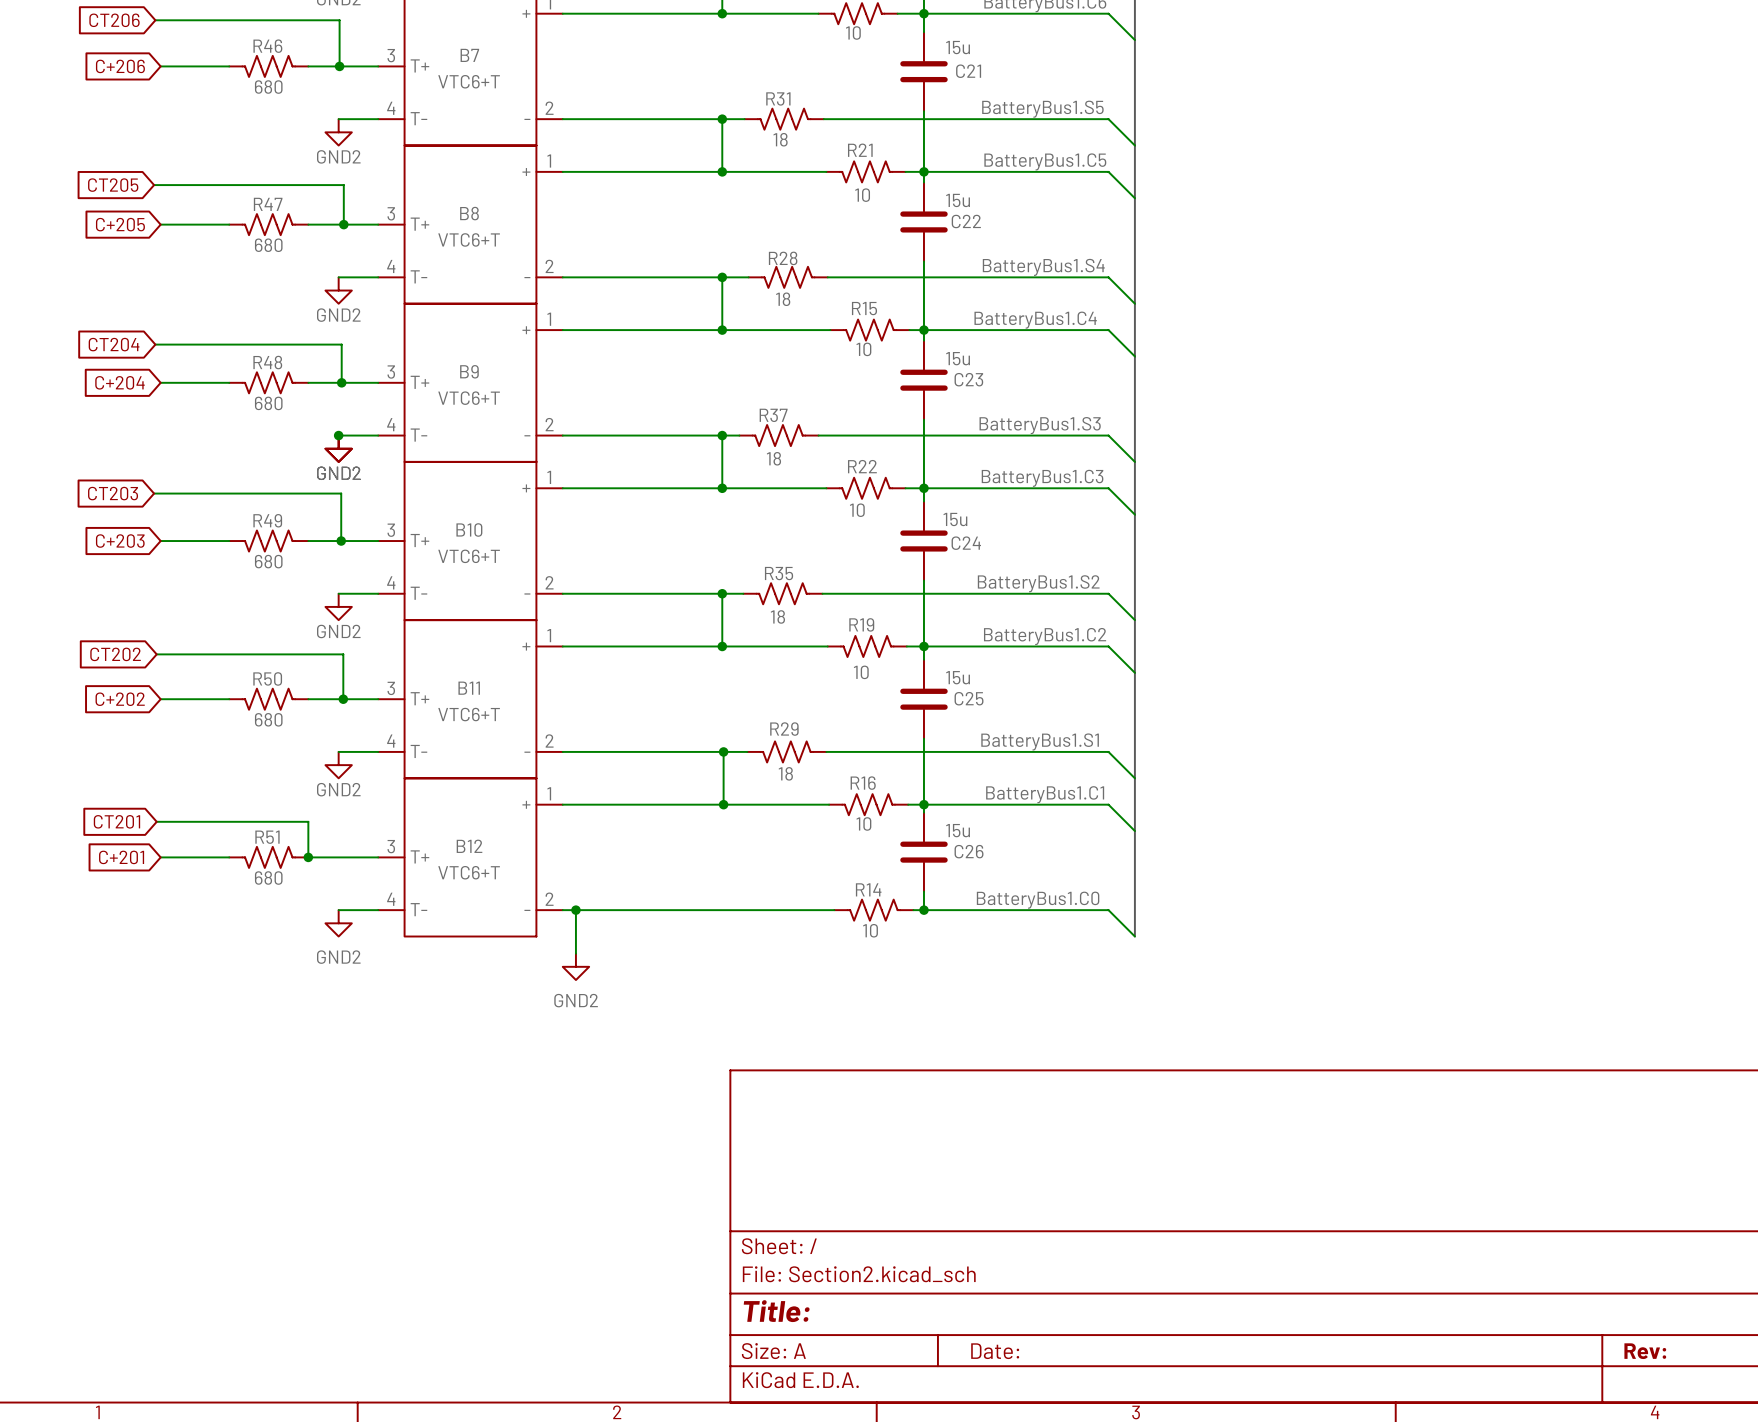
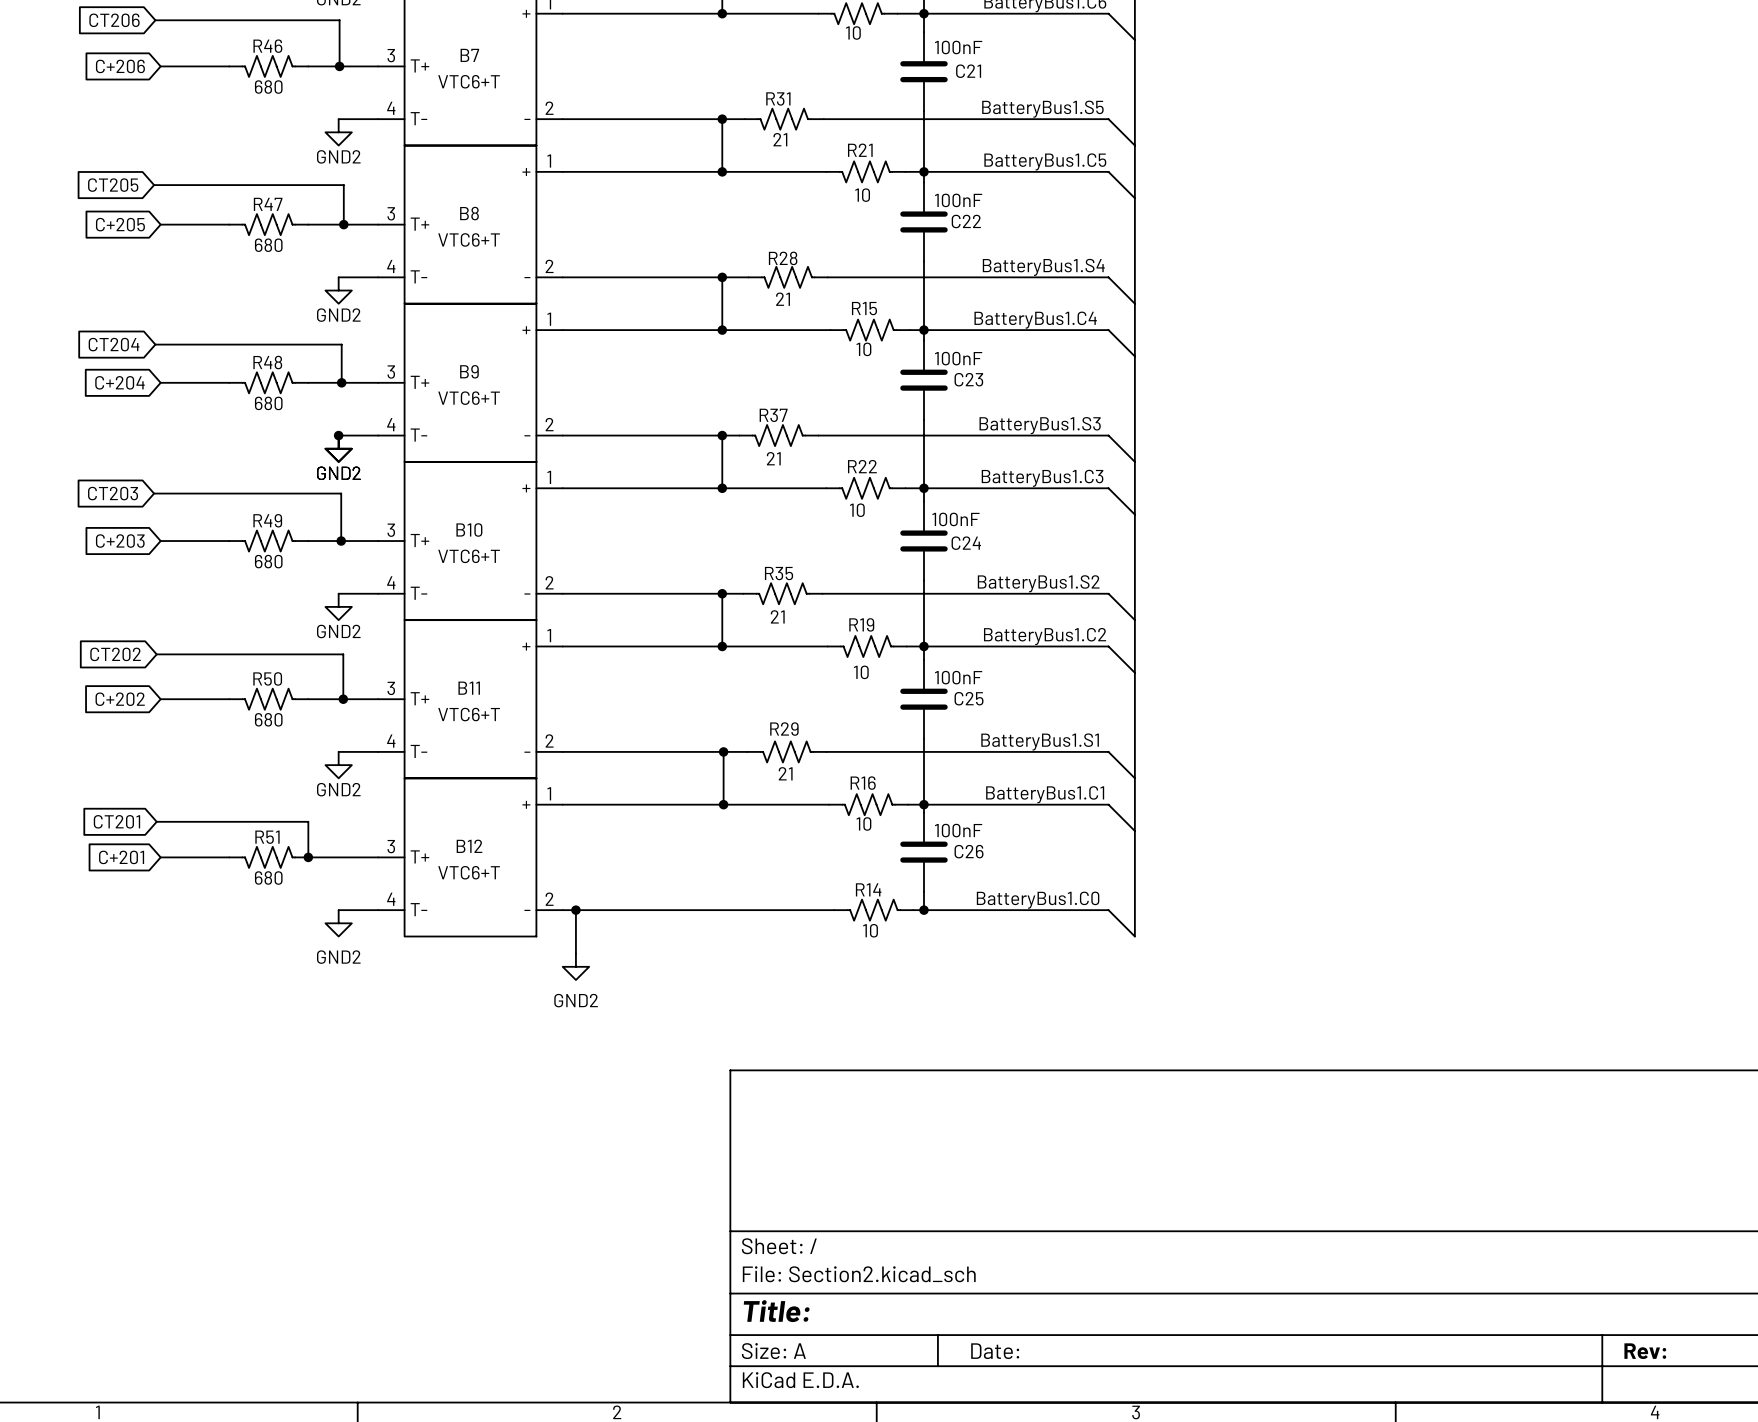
C21 value: 15u (958, 47) -> 100nF (958, 47)
R31 value: 18 (780, 139) -> 21 (780, 139)
C22 value: 15u (958, 200) -> 100nF (958, 200)
R28 value: 18 (783, 299) -> 21 (783, 299)
C23 value: 15u (958, 358) -> 100nF (958, 358)
R37 value: 18 (773, 458) -> 21 (773, 458)
C24 value: 15u (955, 519) -> 100nF (955, 519)
R35 value: 18 (777, 616) -> 21 (777, 616)
C25 value: 15u (958, 677) -> 100nF (958, 677)
R29 value: 18 (785, 773) -> 21 (785, 773)
C26 value: 15u (958, 830) -> 100nF (958, 830)

